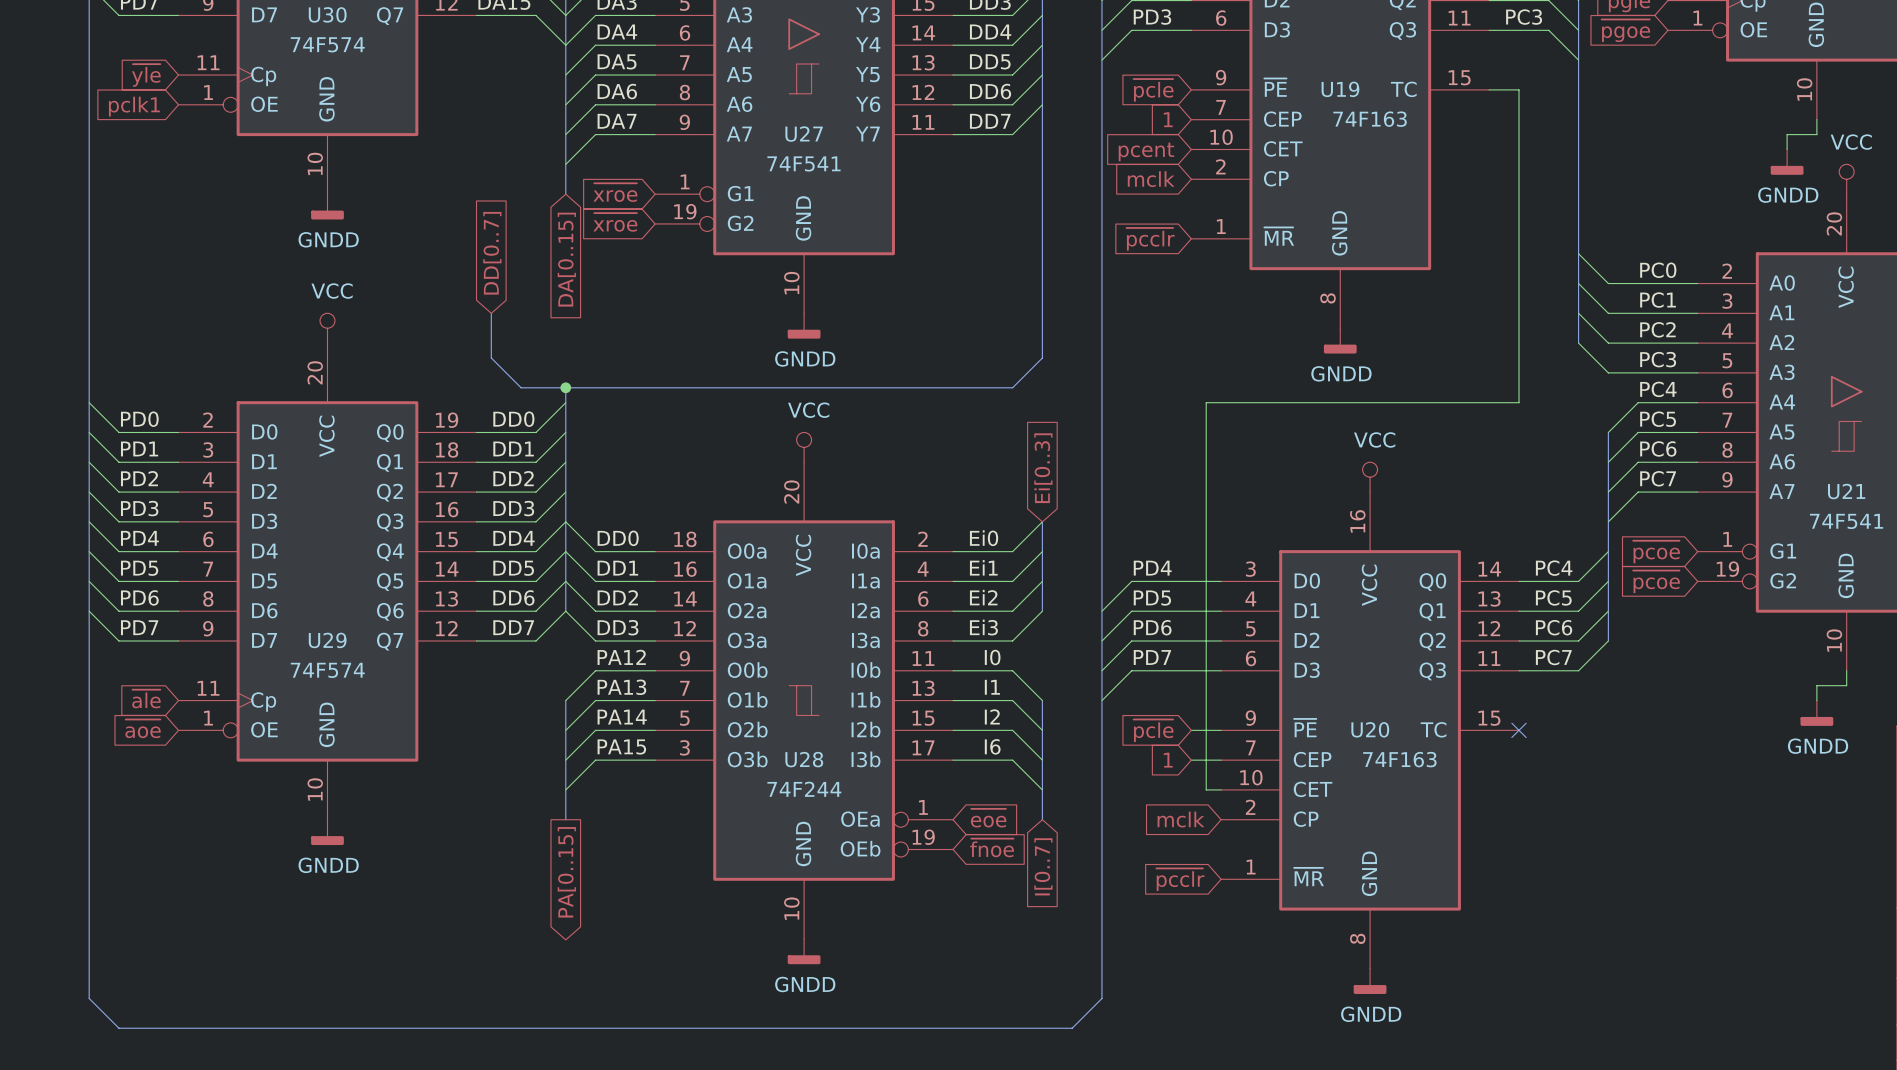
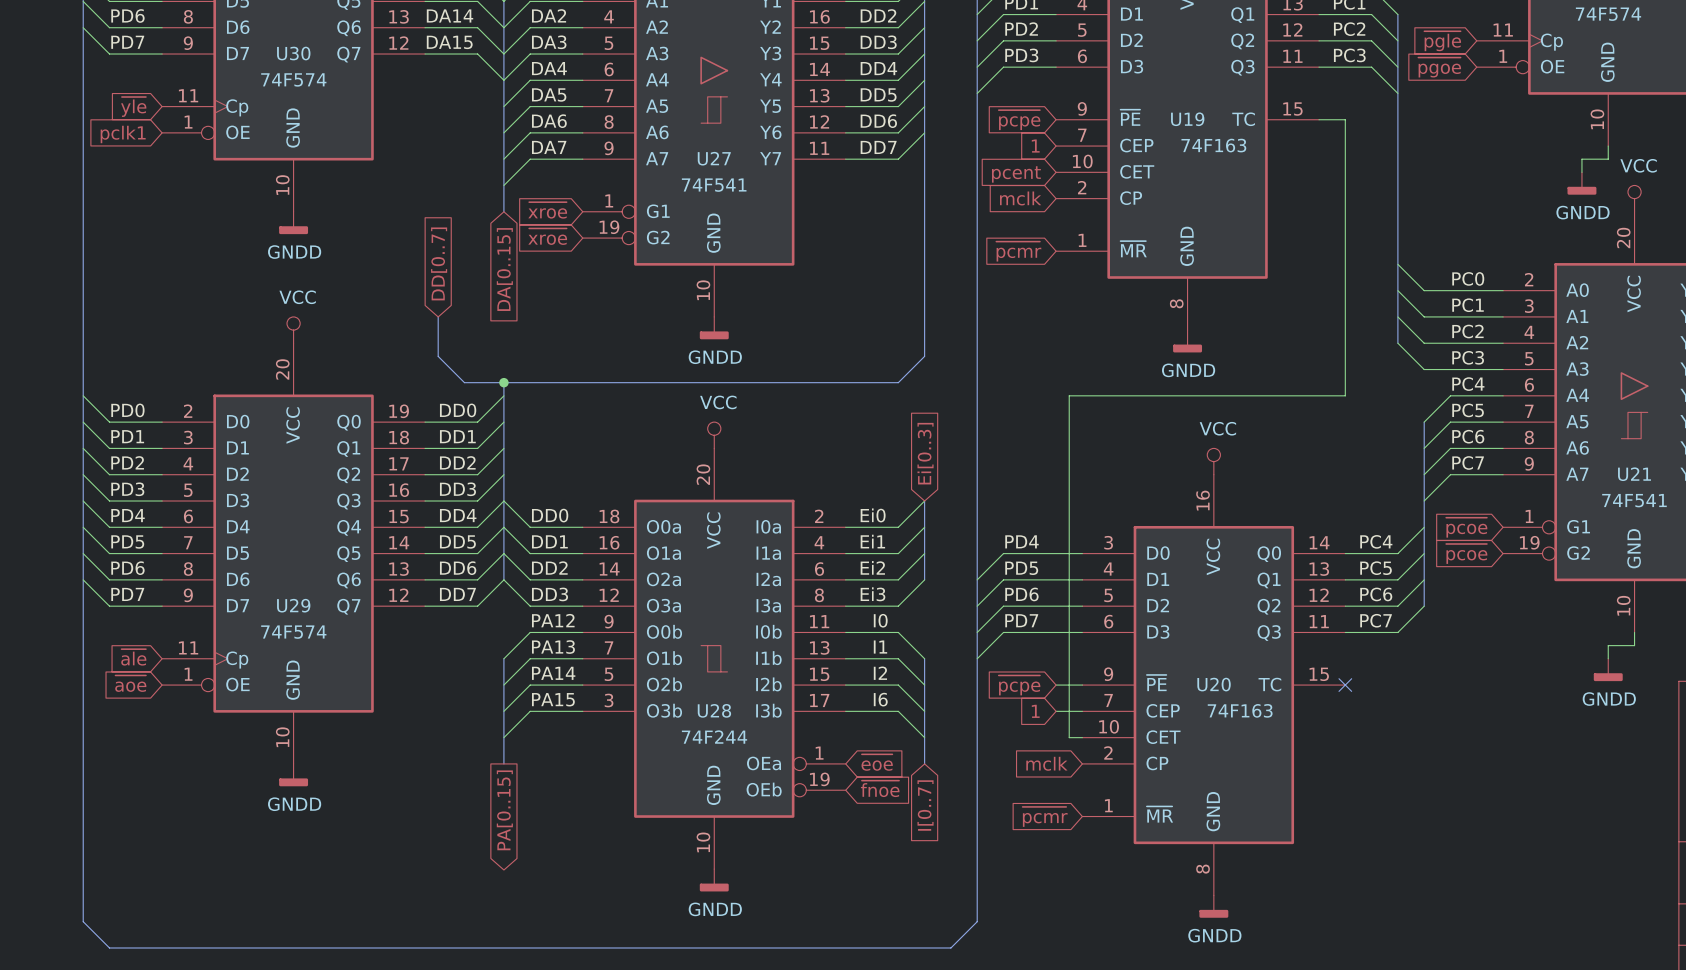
global label: ~{pcle} (1153, 90) -> ~{pcpe} (1019, 120)
global label: ~{pcclr} (1150, 239) -> ~{pcmr} (1018, 251)
global label: ~{pcle} (1153, 730) -> ~{pcpe} (1019, 685)
global label: ~{pcclr} (1180, 879) -> ~{pcmr} (1045, 816)

